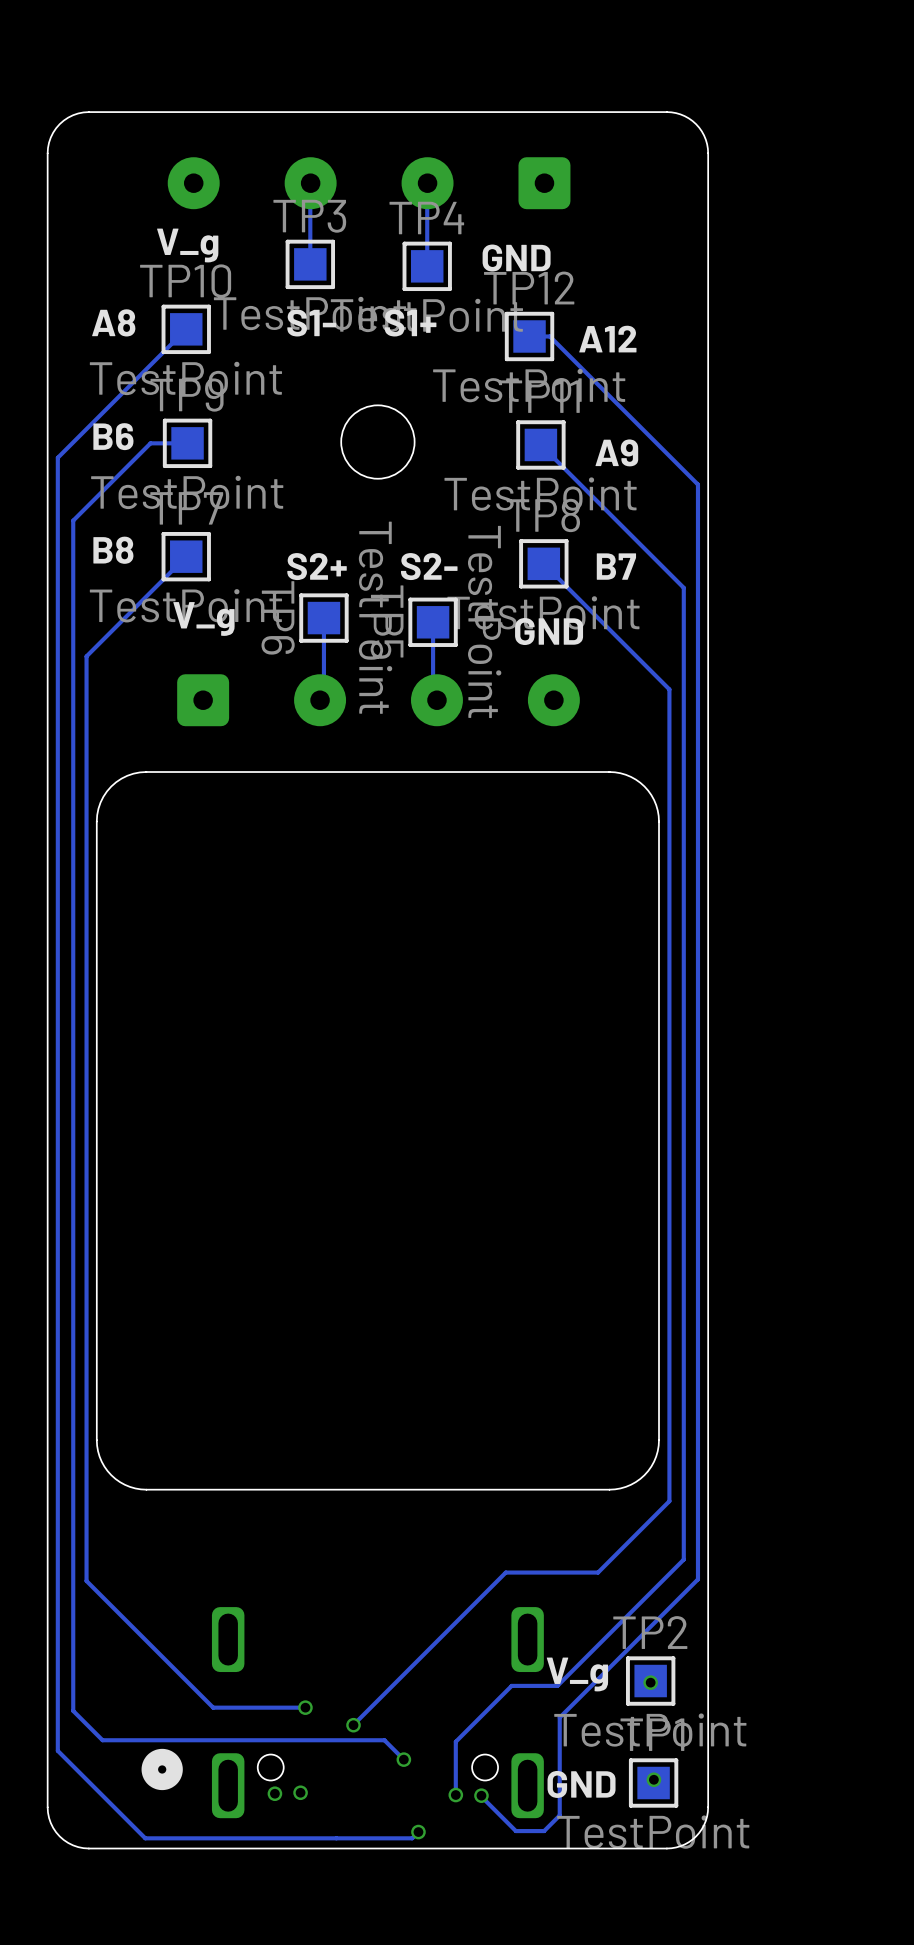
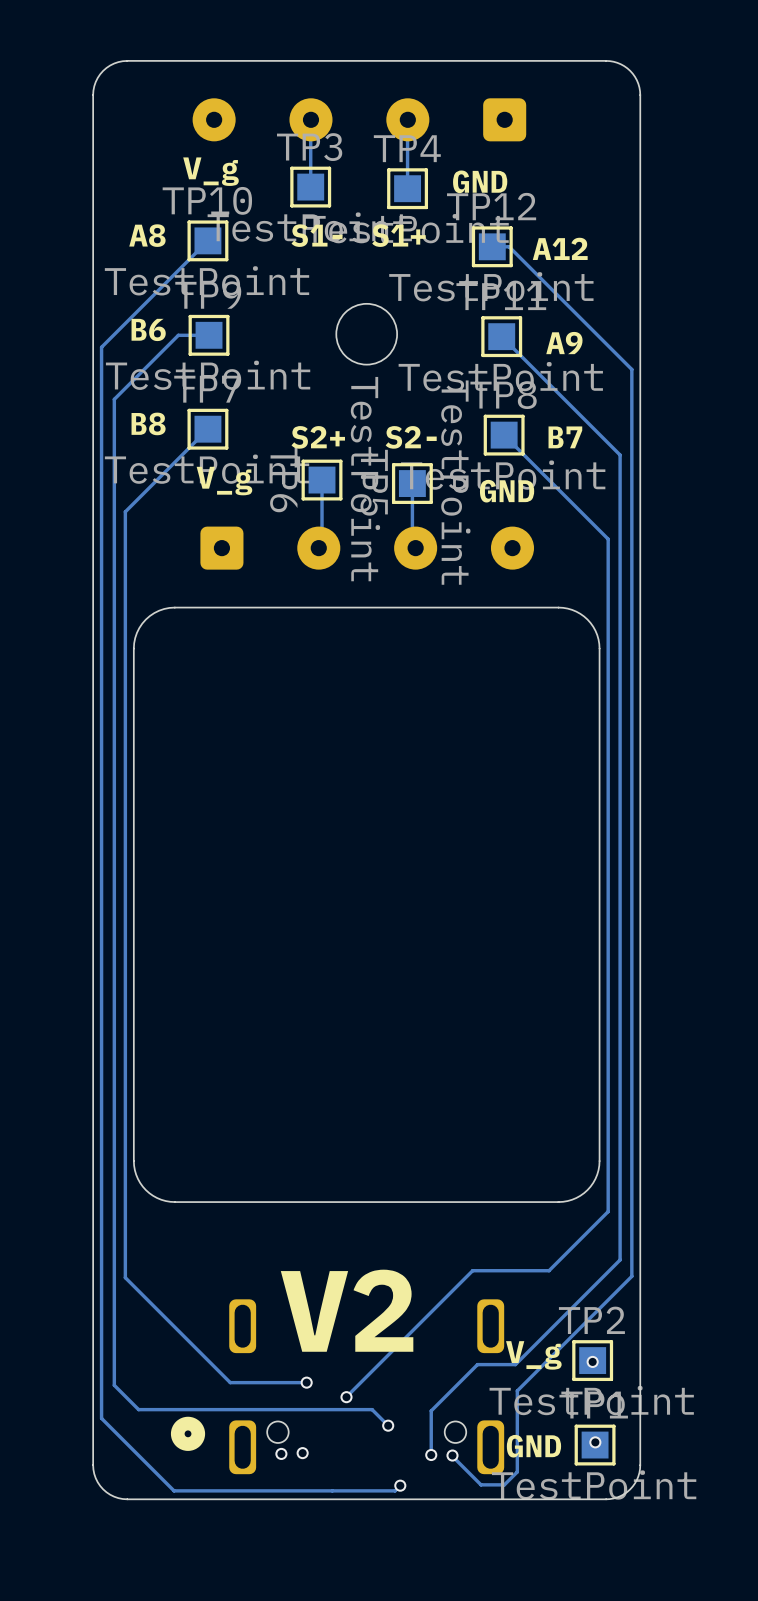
text: none -> V2 (347, 1310)

